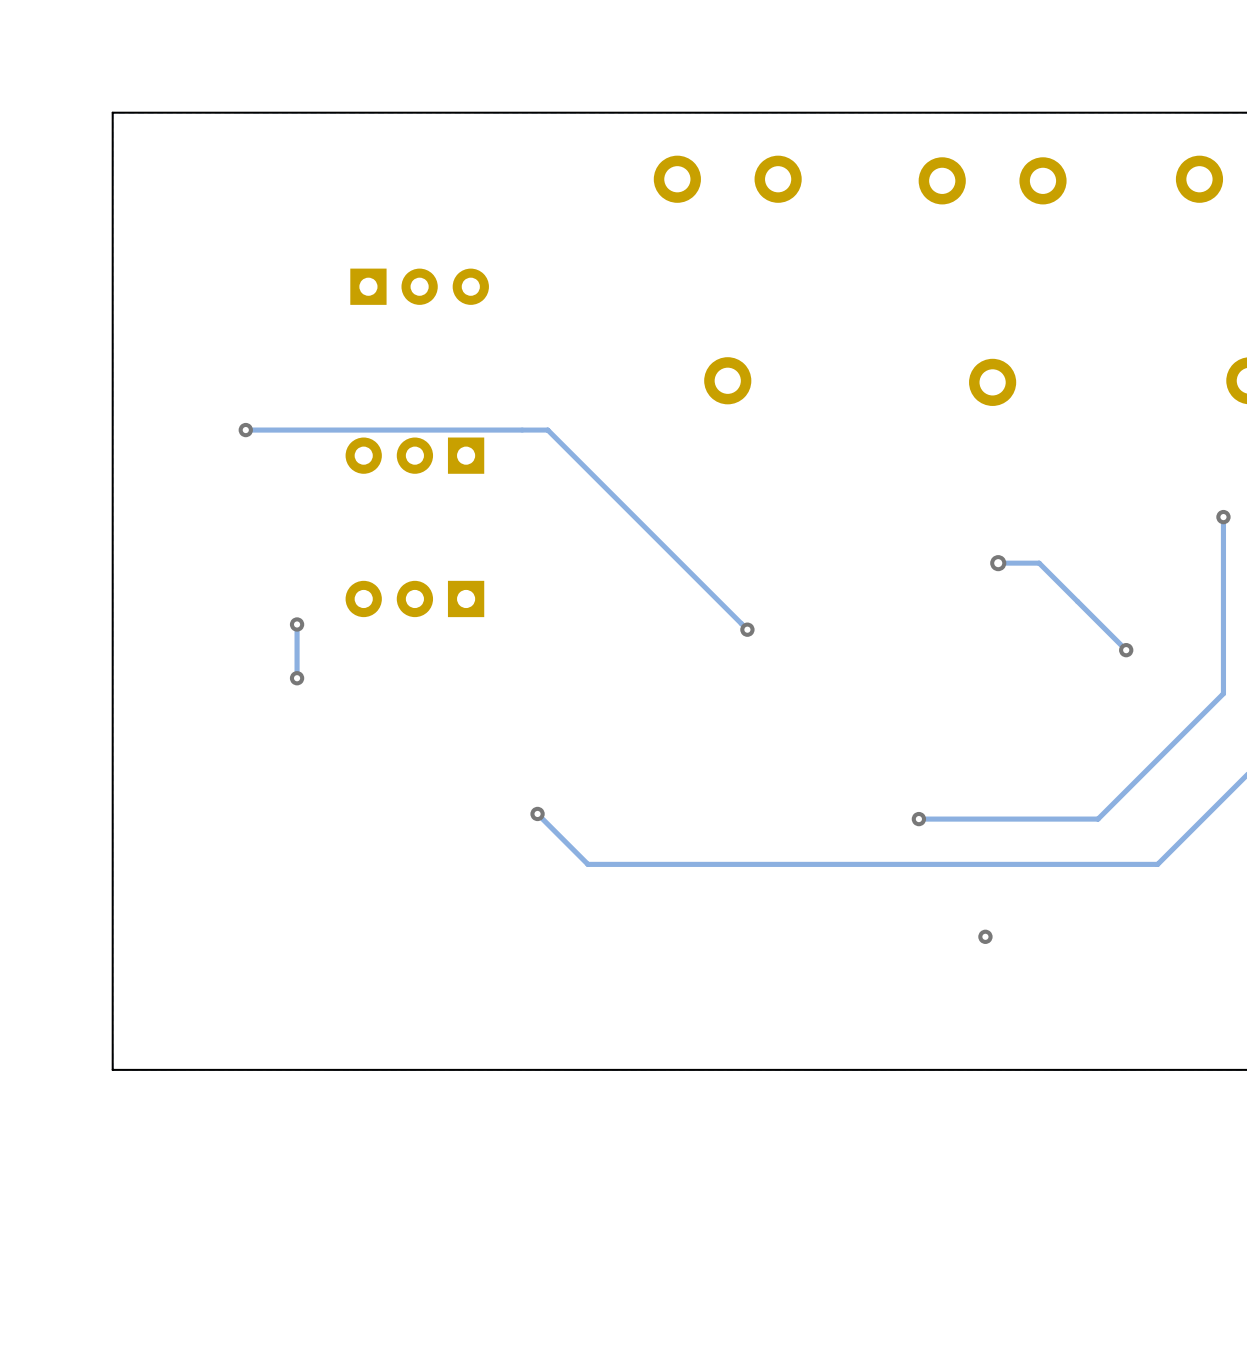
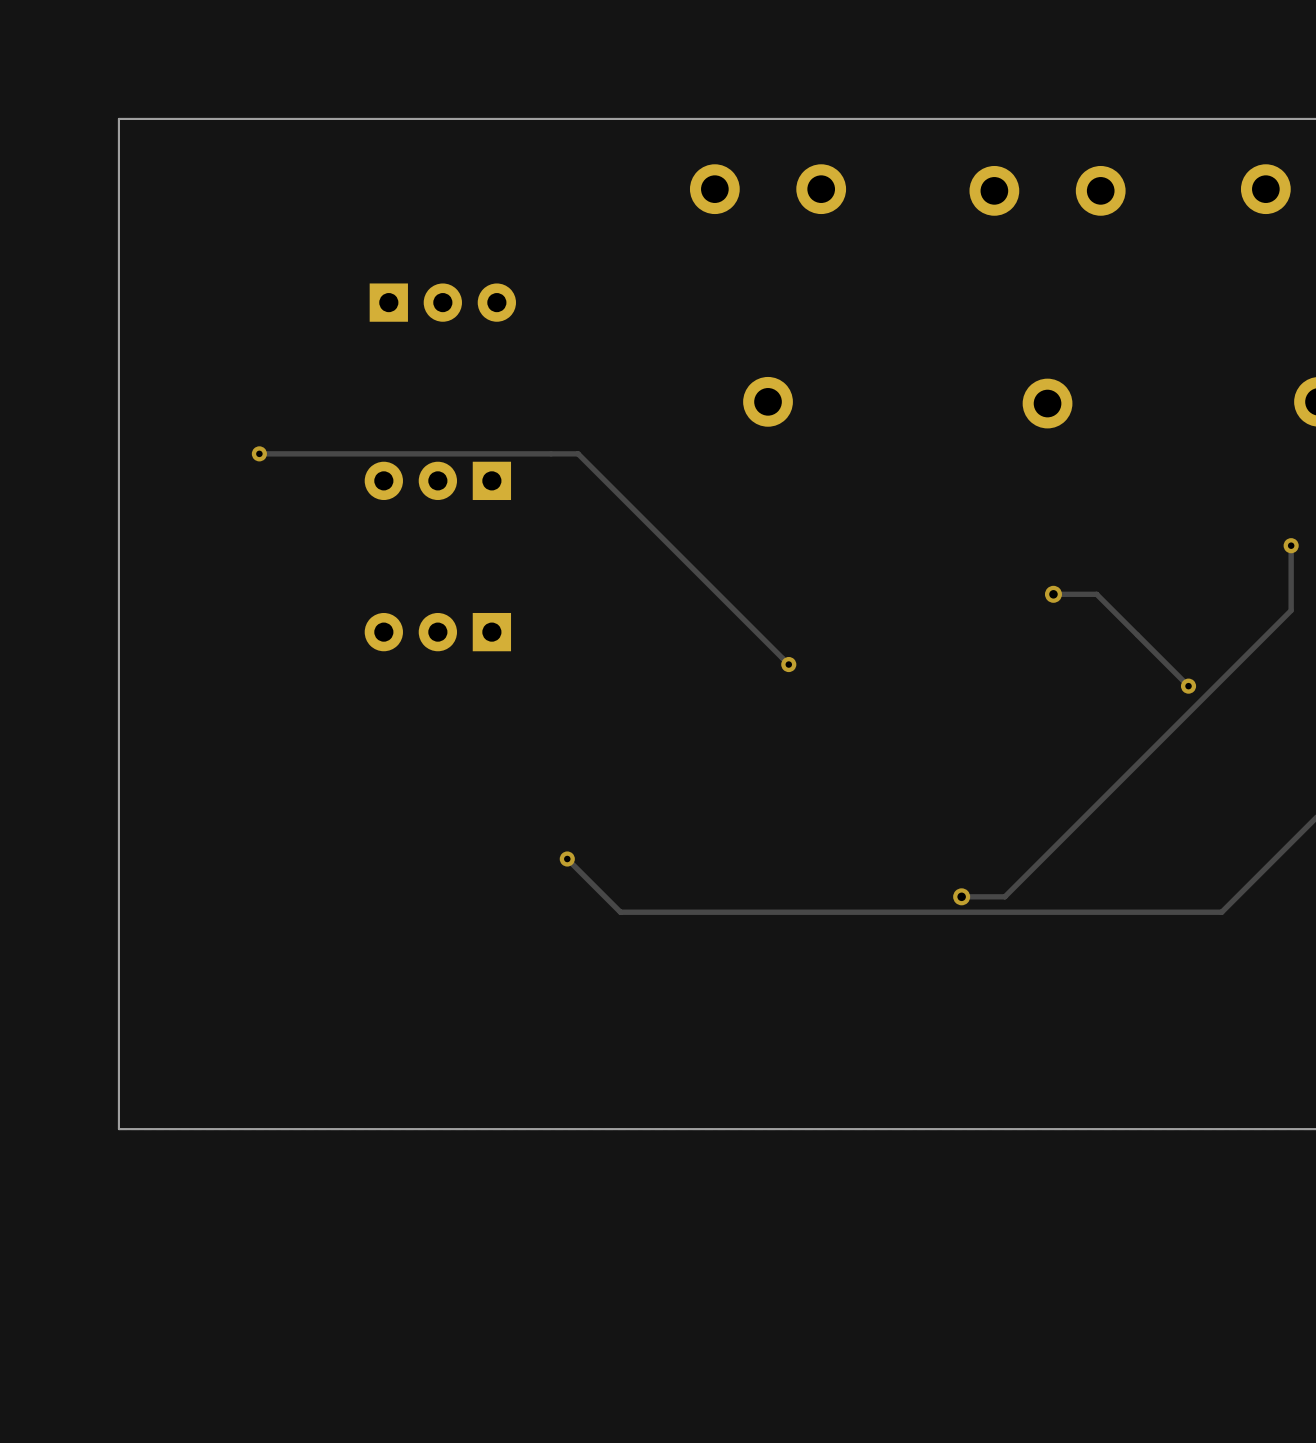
track: (1223, 578) (1223, 693) (1098, 819) (918, 819) -> (1291, 610) (1004, 896) (961, 896)
track: (297, 624) (297, 678) -> none
via: (297, 624) -> none
via: (297, 678) -> none
via: (918, 819) -> none
via: none -> (961, 896)
via: (985, 936) -> none

